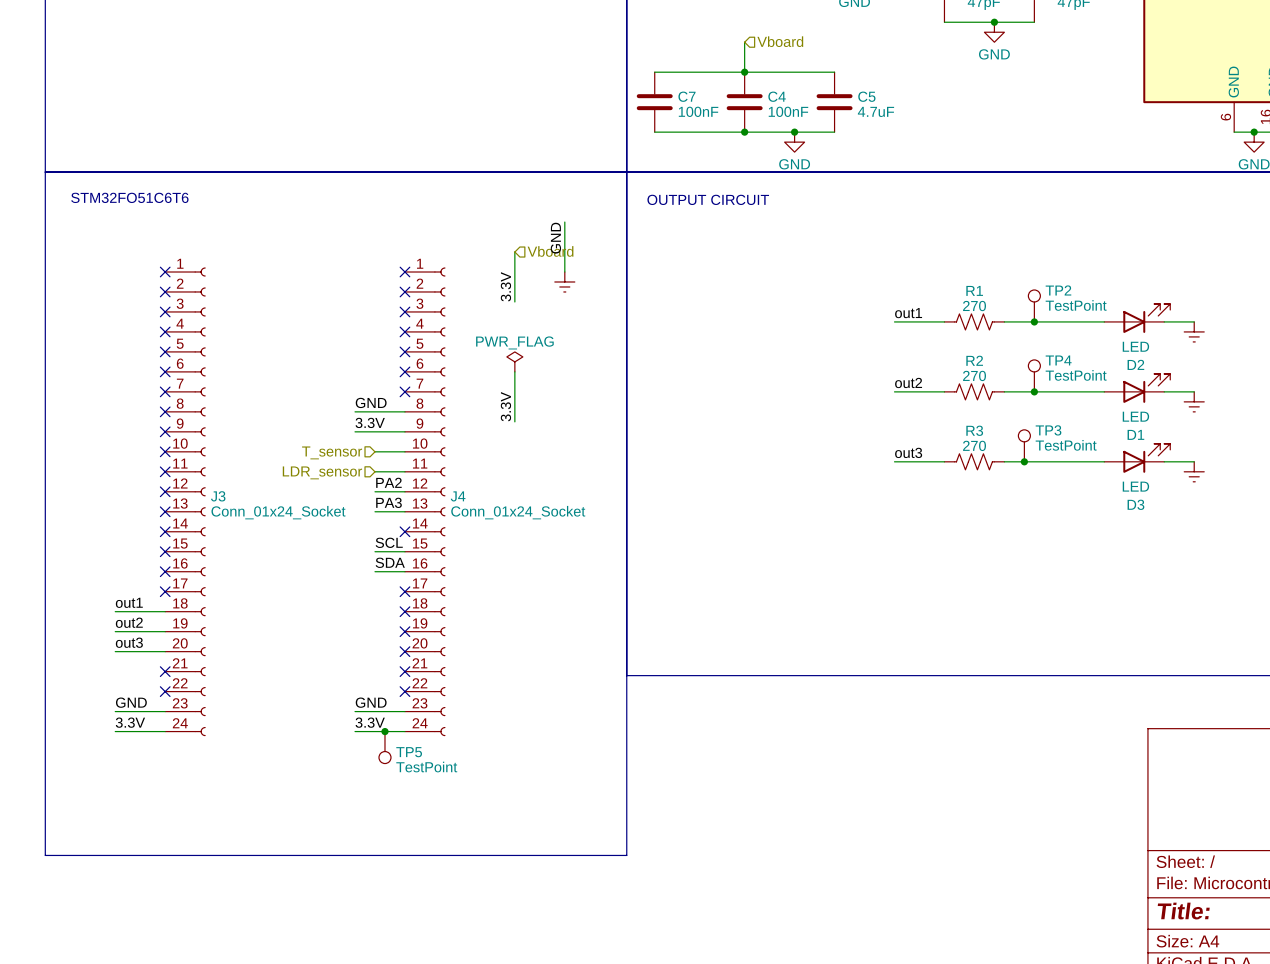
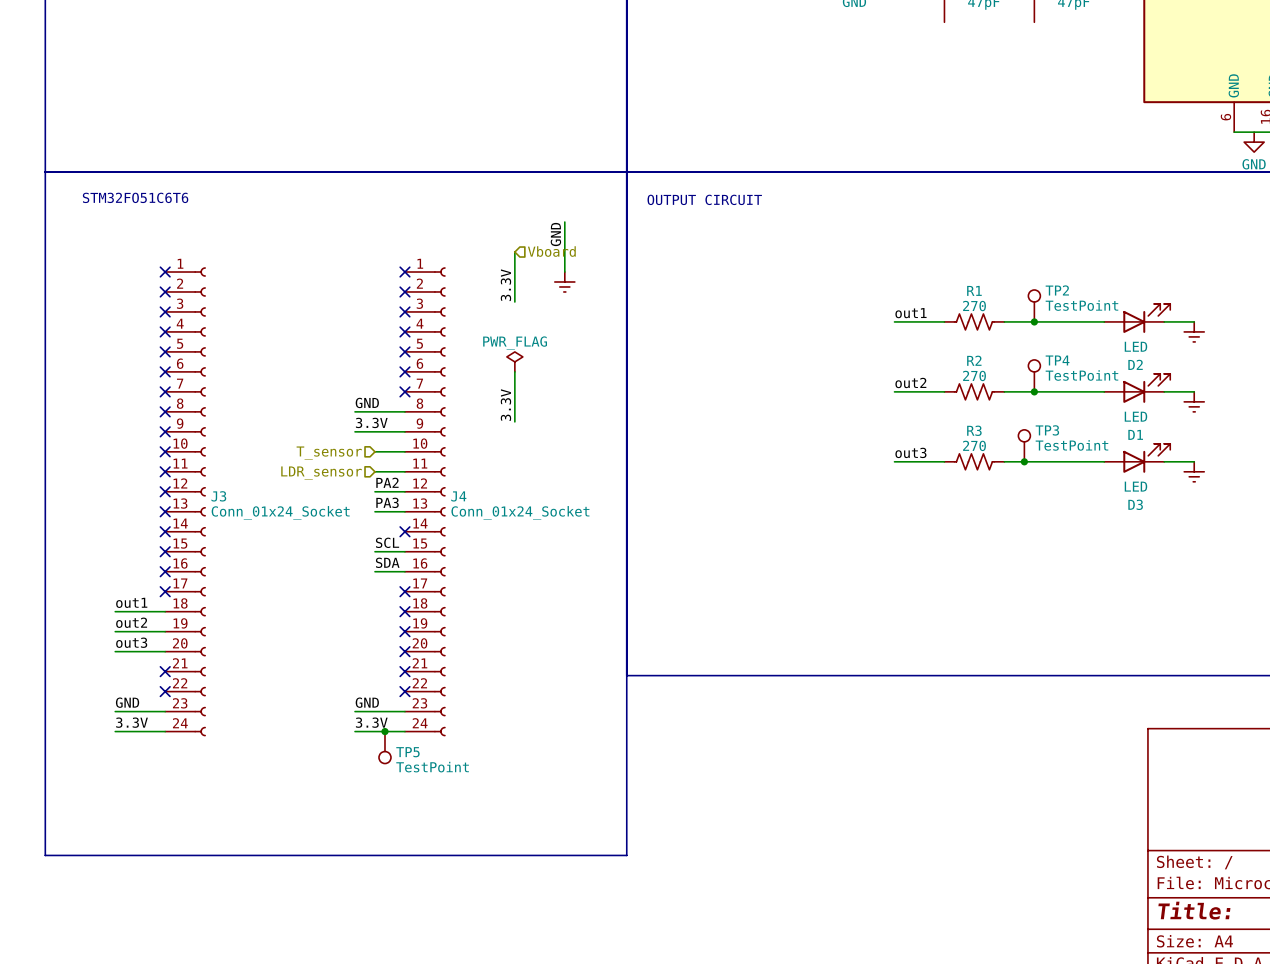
wire: (944, 22) (1034, 22) -> none
junction: (994, 22) -> none
power symbol: GND (994, 32) -> none
hierarchical label: Vboard (780, 41) -> none
wire: (744, 42) (744, 72) -> none
wire: (654, 72) (834, 72) -> none
junction: (744, 72) -> none
C7: 100nF (654, 102) -> none
C4: 100nF (744, 102) -> none
C5: 4.7uF (834, 102) -> none
wire: (654, 132) (834, 132) -> none
junction: (744, 132) -> none
junction: (794, 132) -> none
junction: (1254, 132) -> none
power symbol: GND (794, 142) -> none

